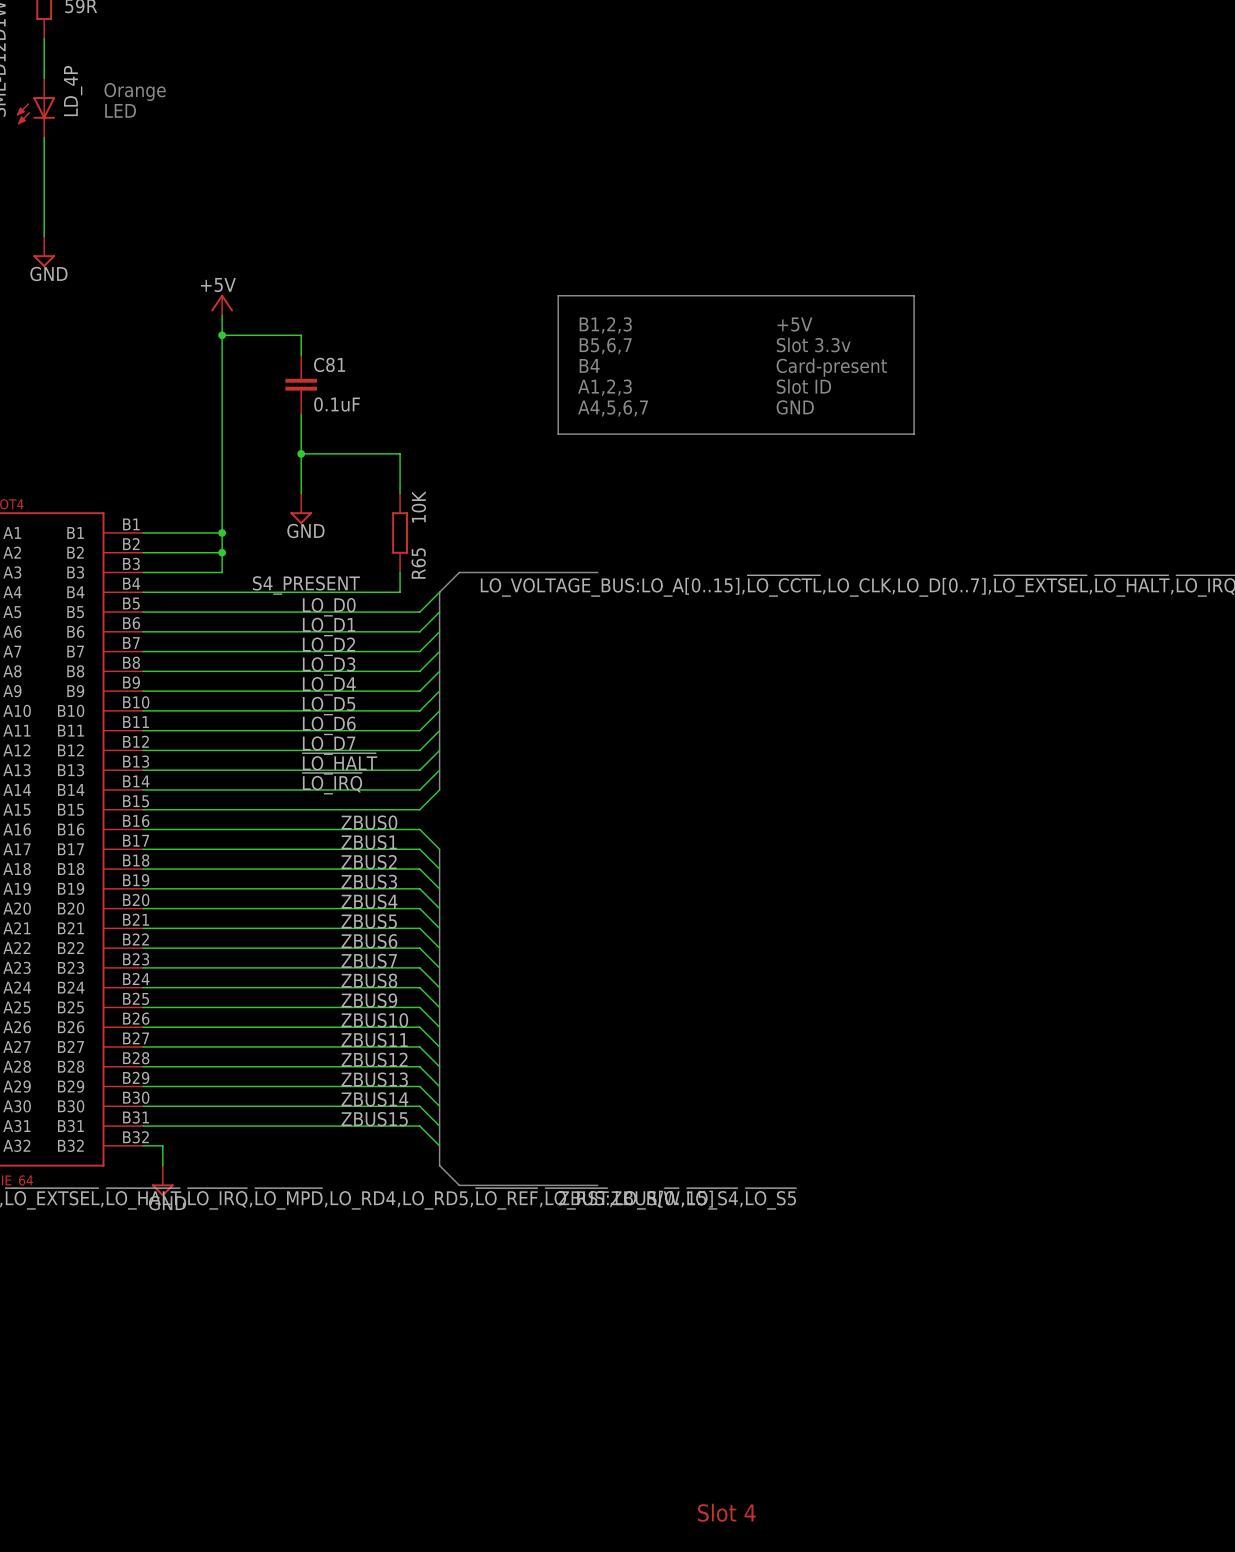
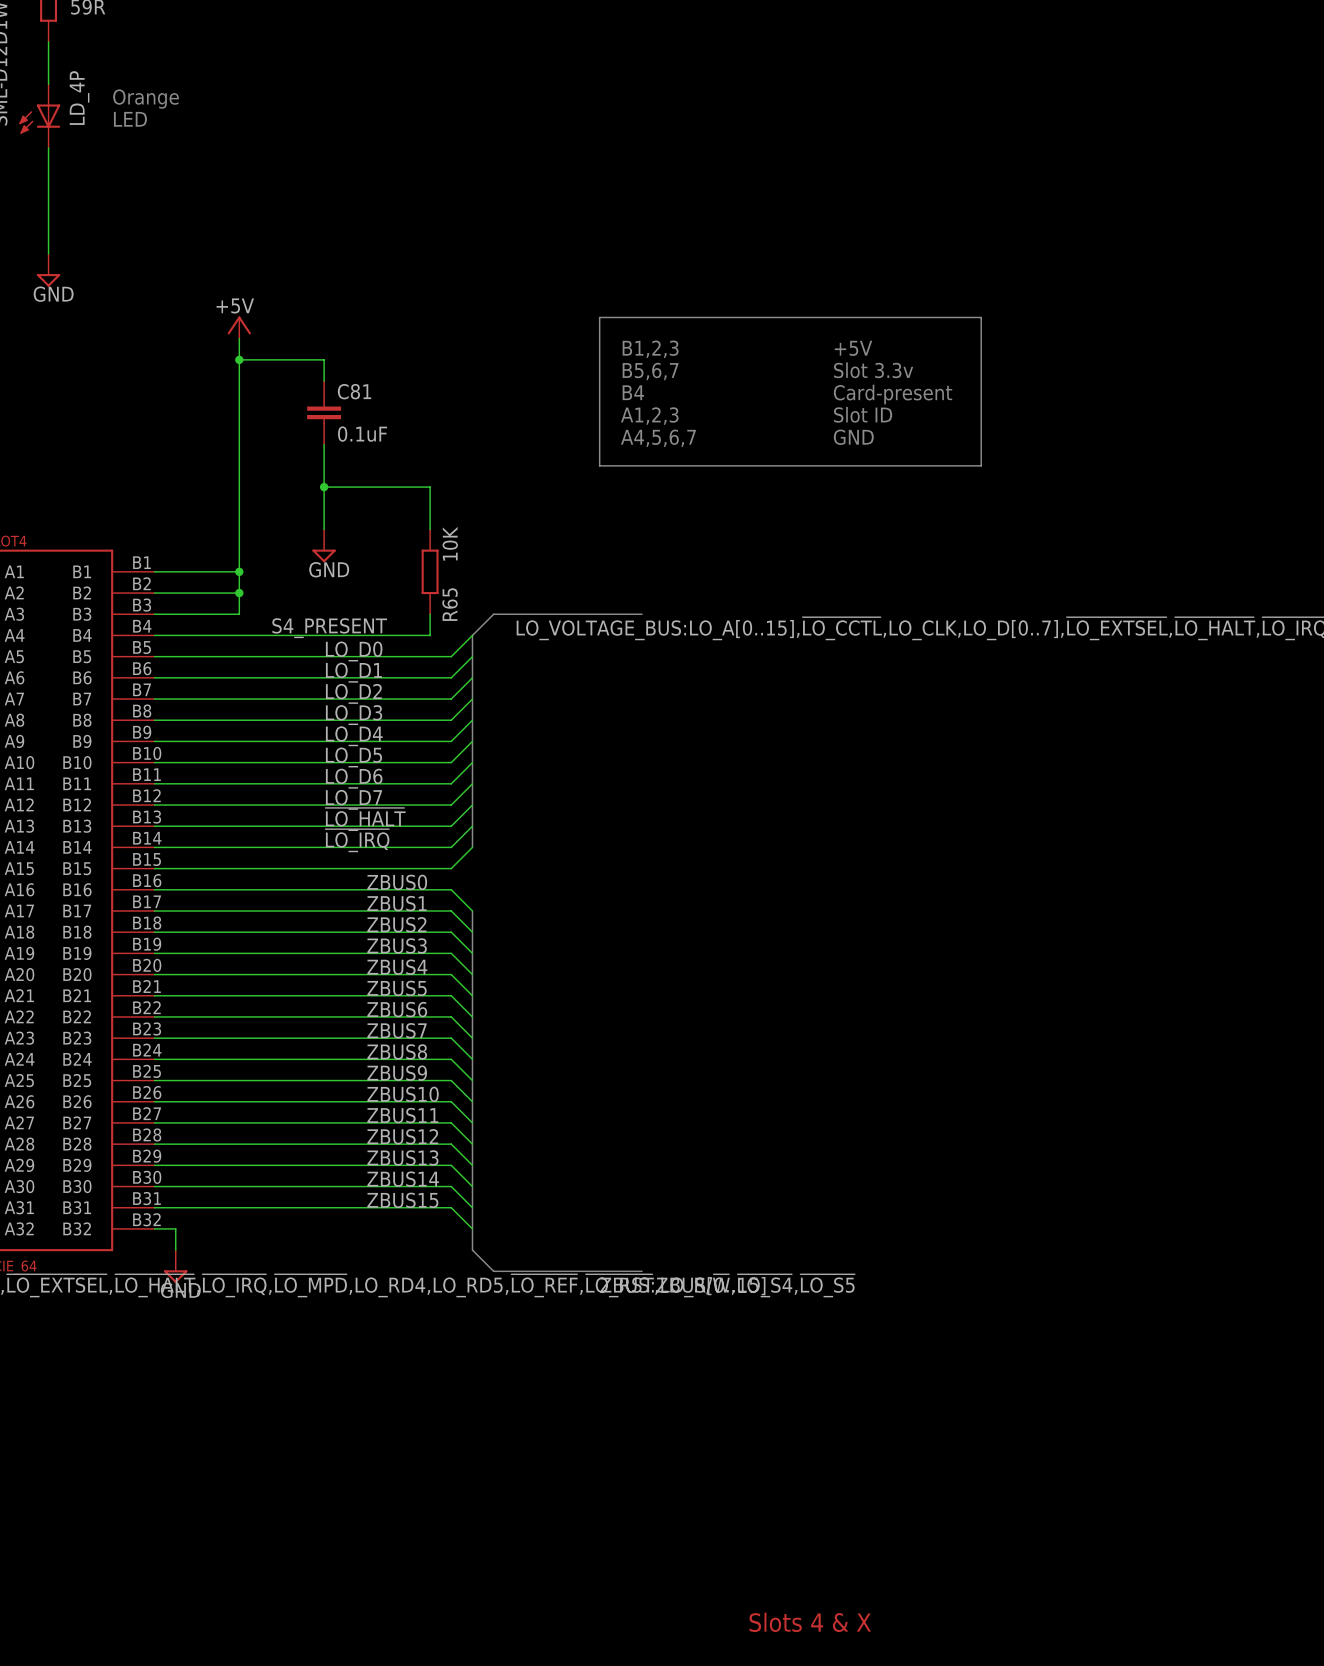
text: Slot 4 (726, 1512) -> Slots 4 & X (810, 1622)

